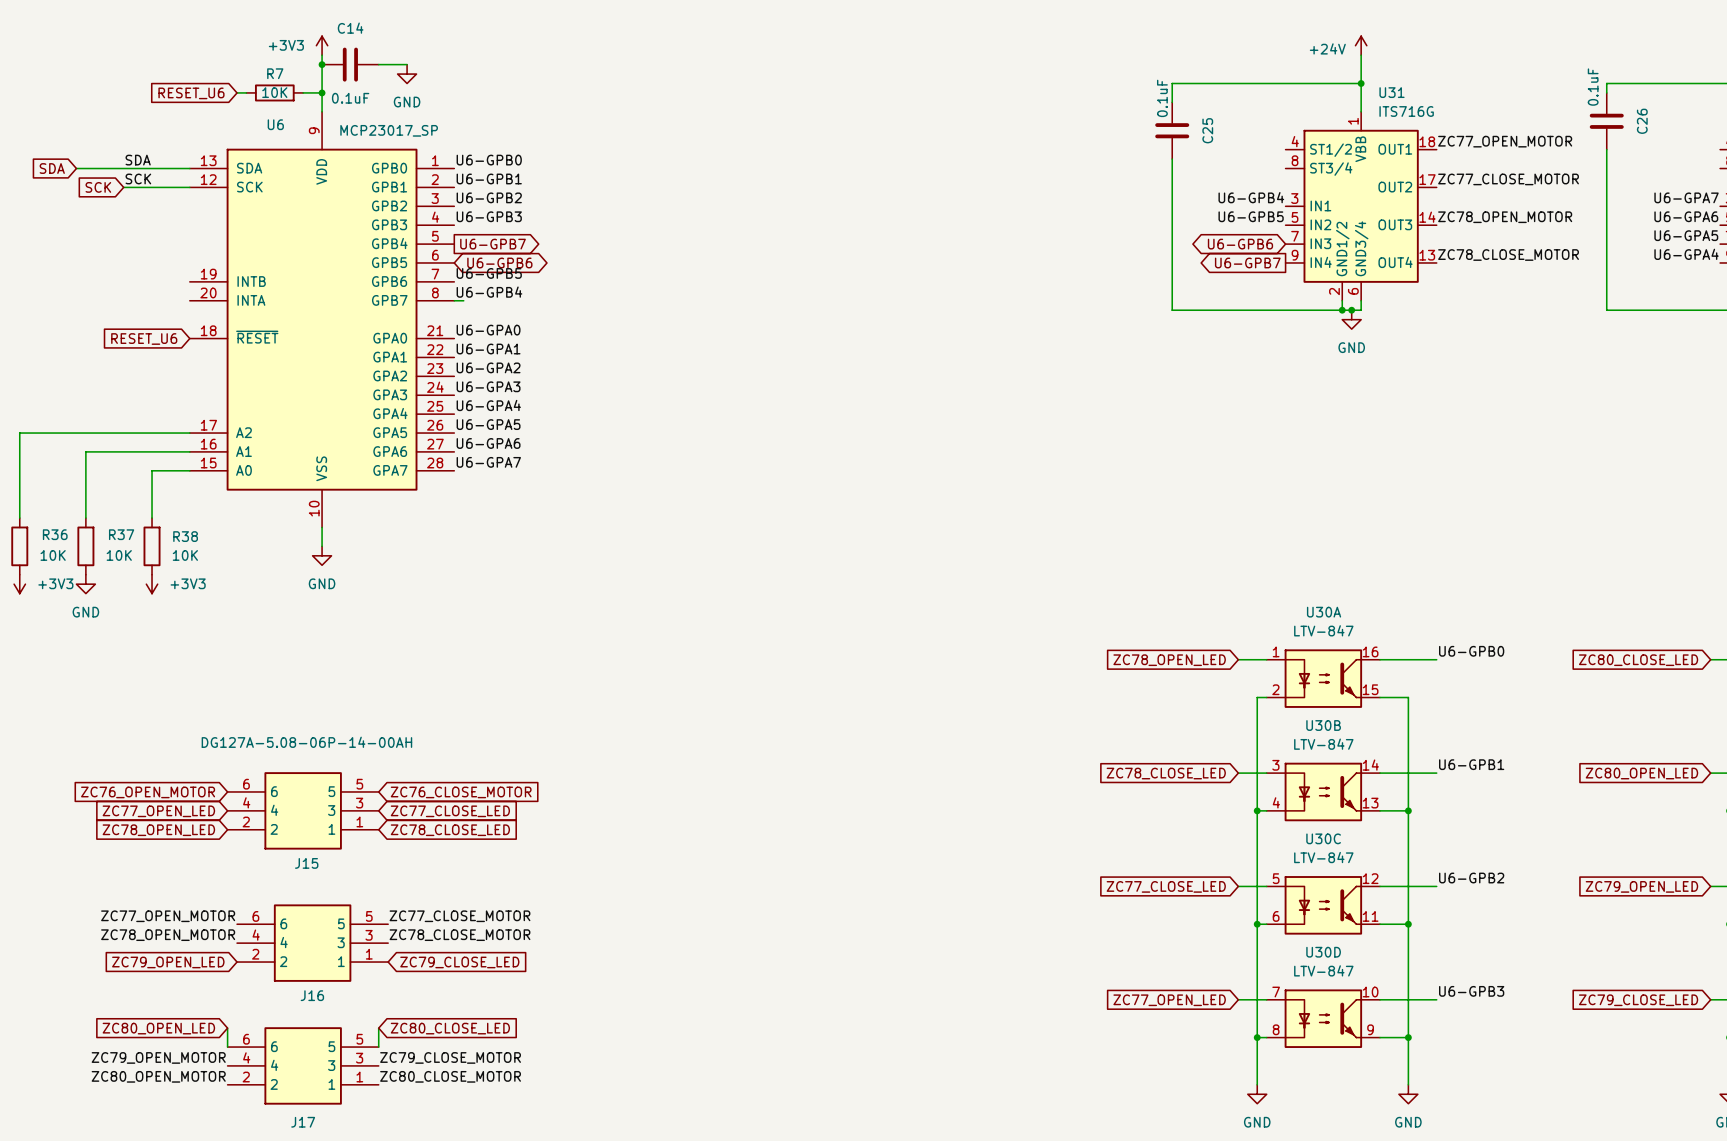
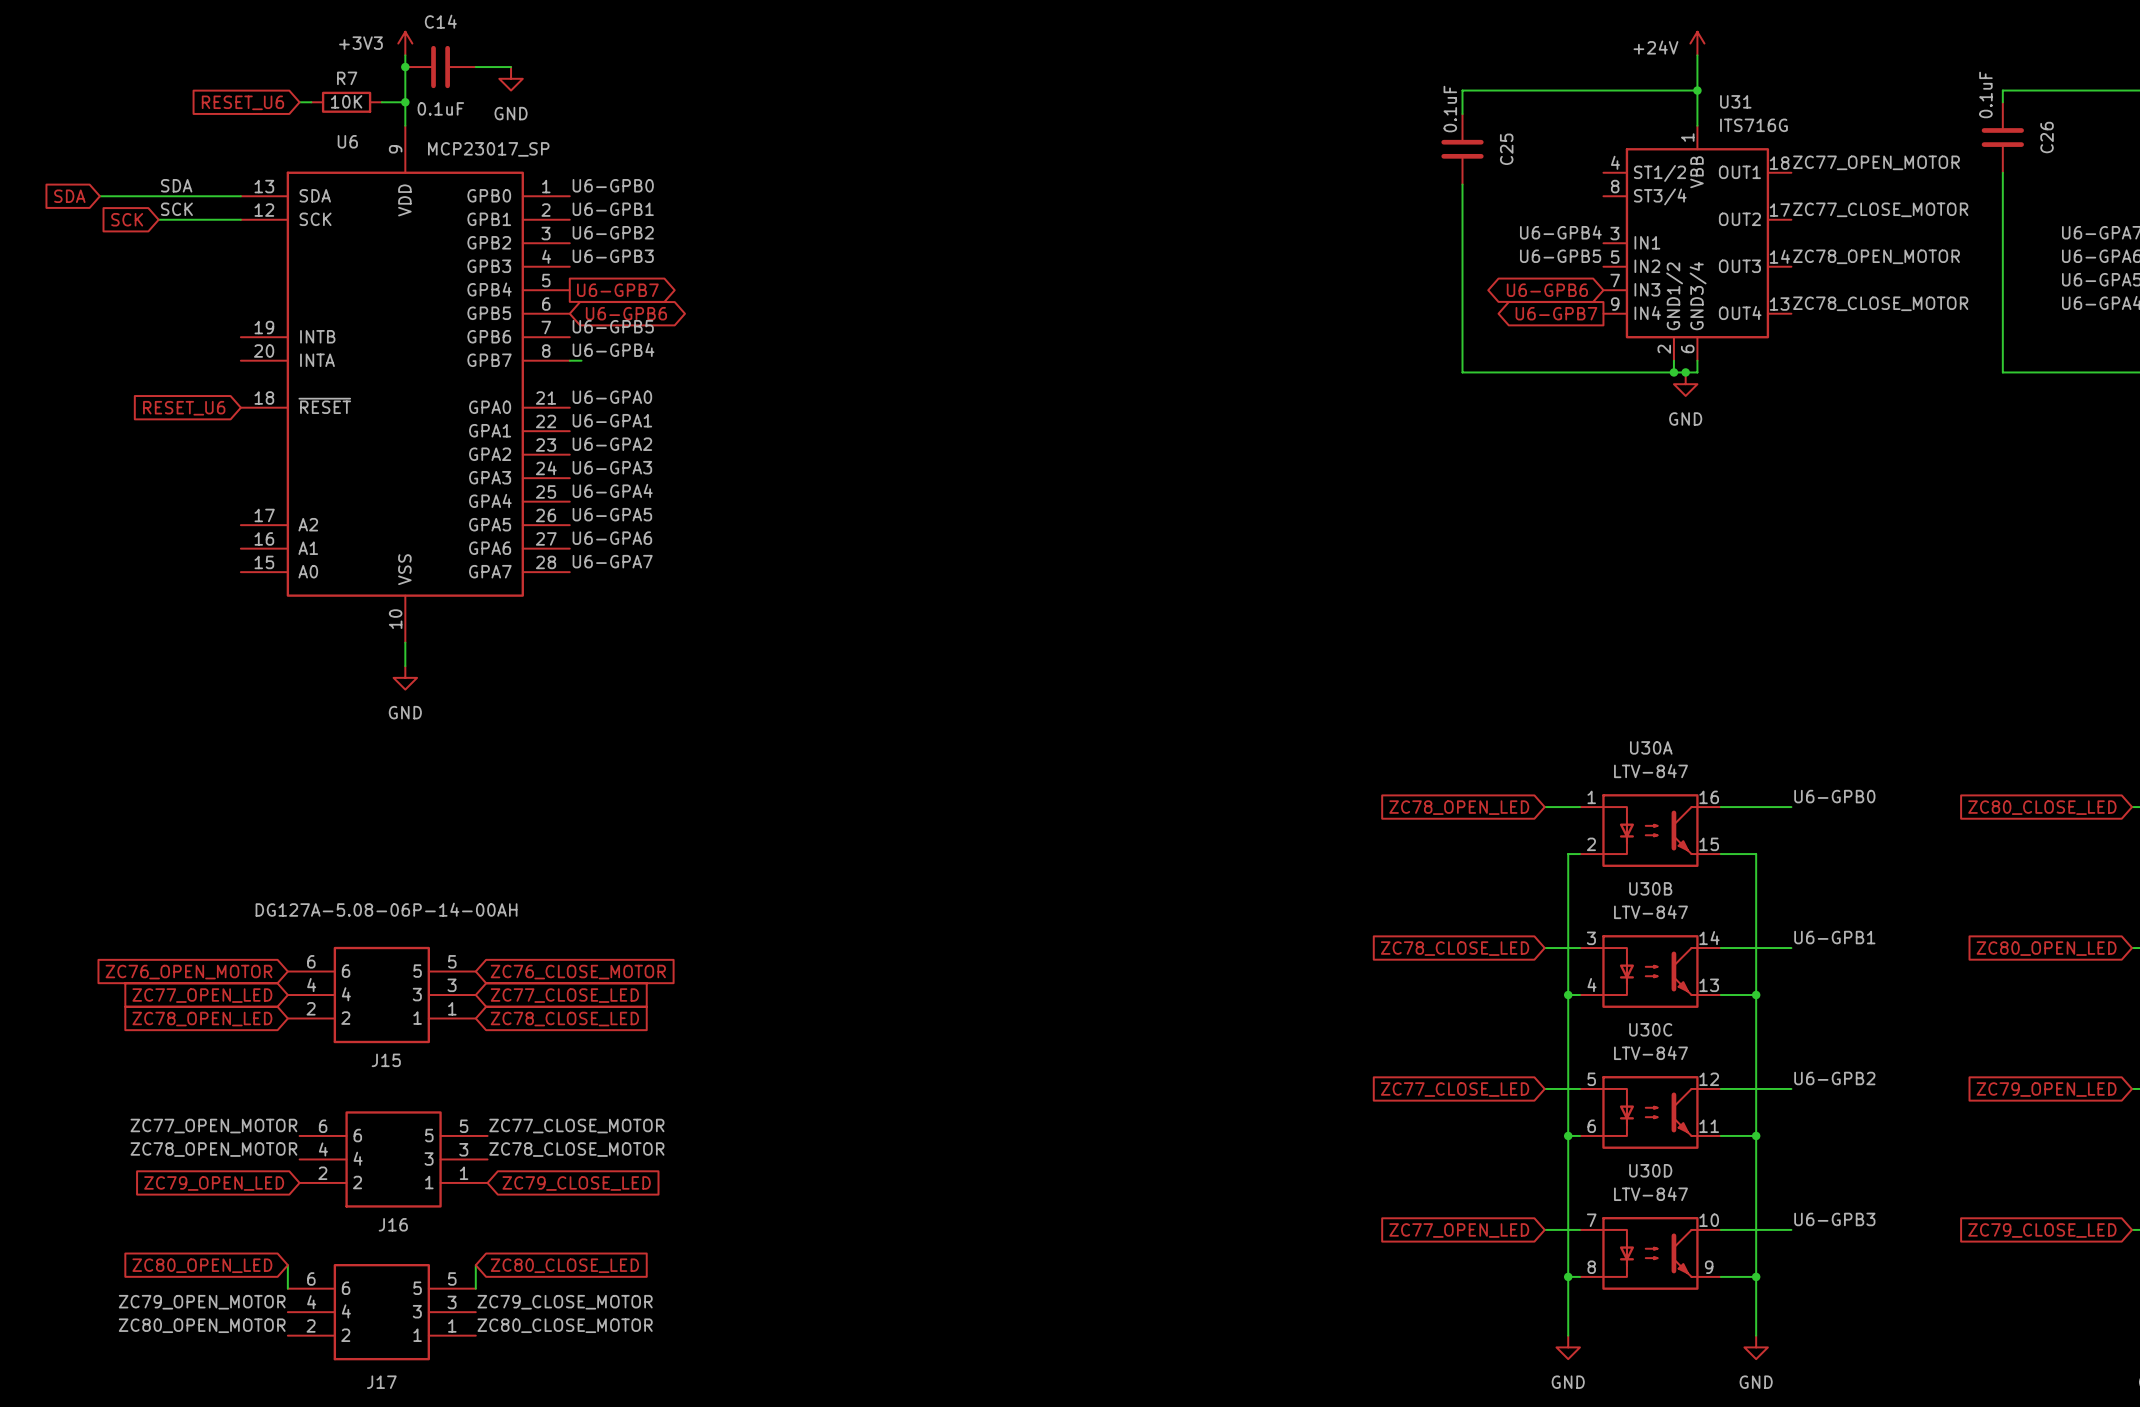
wire: (189, 433) (19, 433) (19, 518) -> none
wire: (189, 451) (85, 451) (85, 518) -> none
wire: (189, 470) (152, 470) (152, 518) -> none
R36: 10K (19, 546) -> none
R37: 10K (85, 546) -> none
R38: 10K (152, 546) -> none
power symbol: +3V3 (19, 584) -> none
power symbol: GND (85, 584) -> none
power symbol: +3V3 (152, 584) -> none

